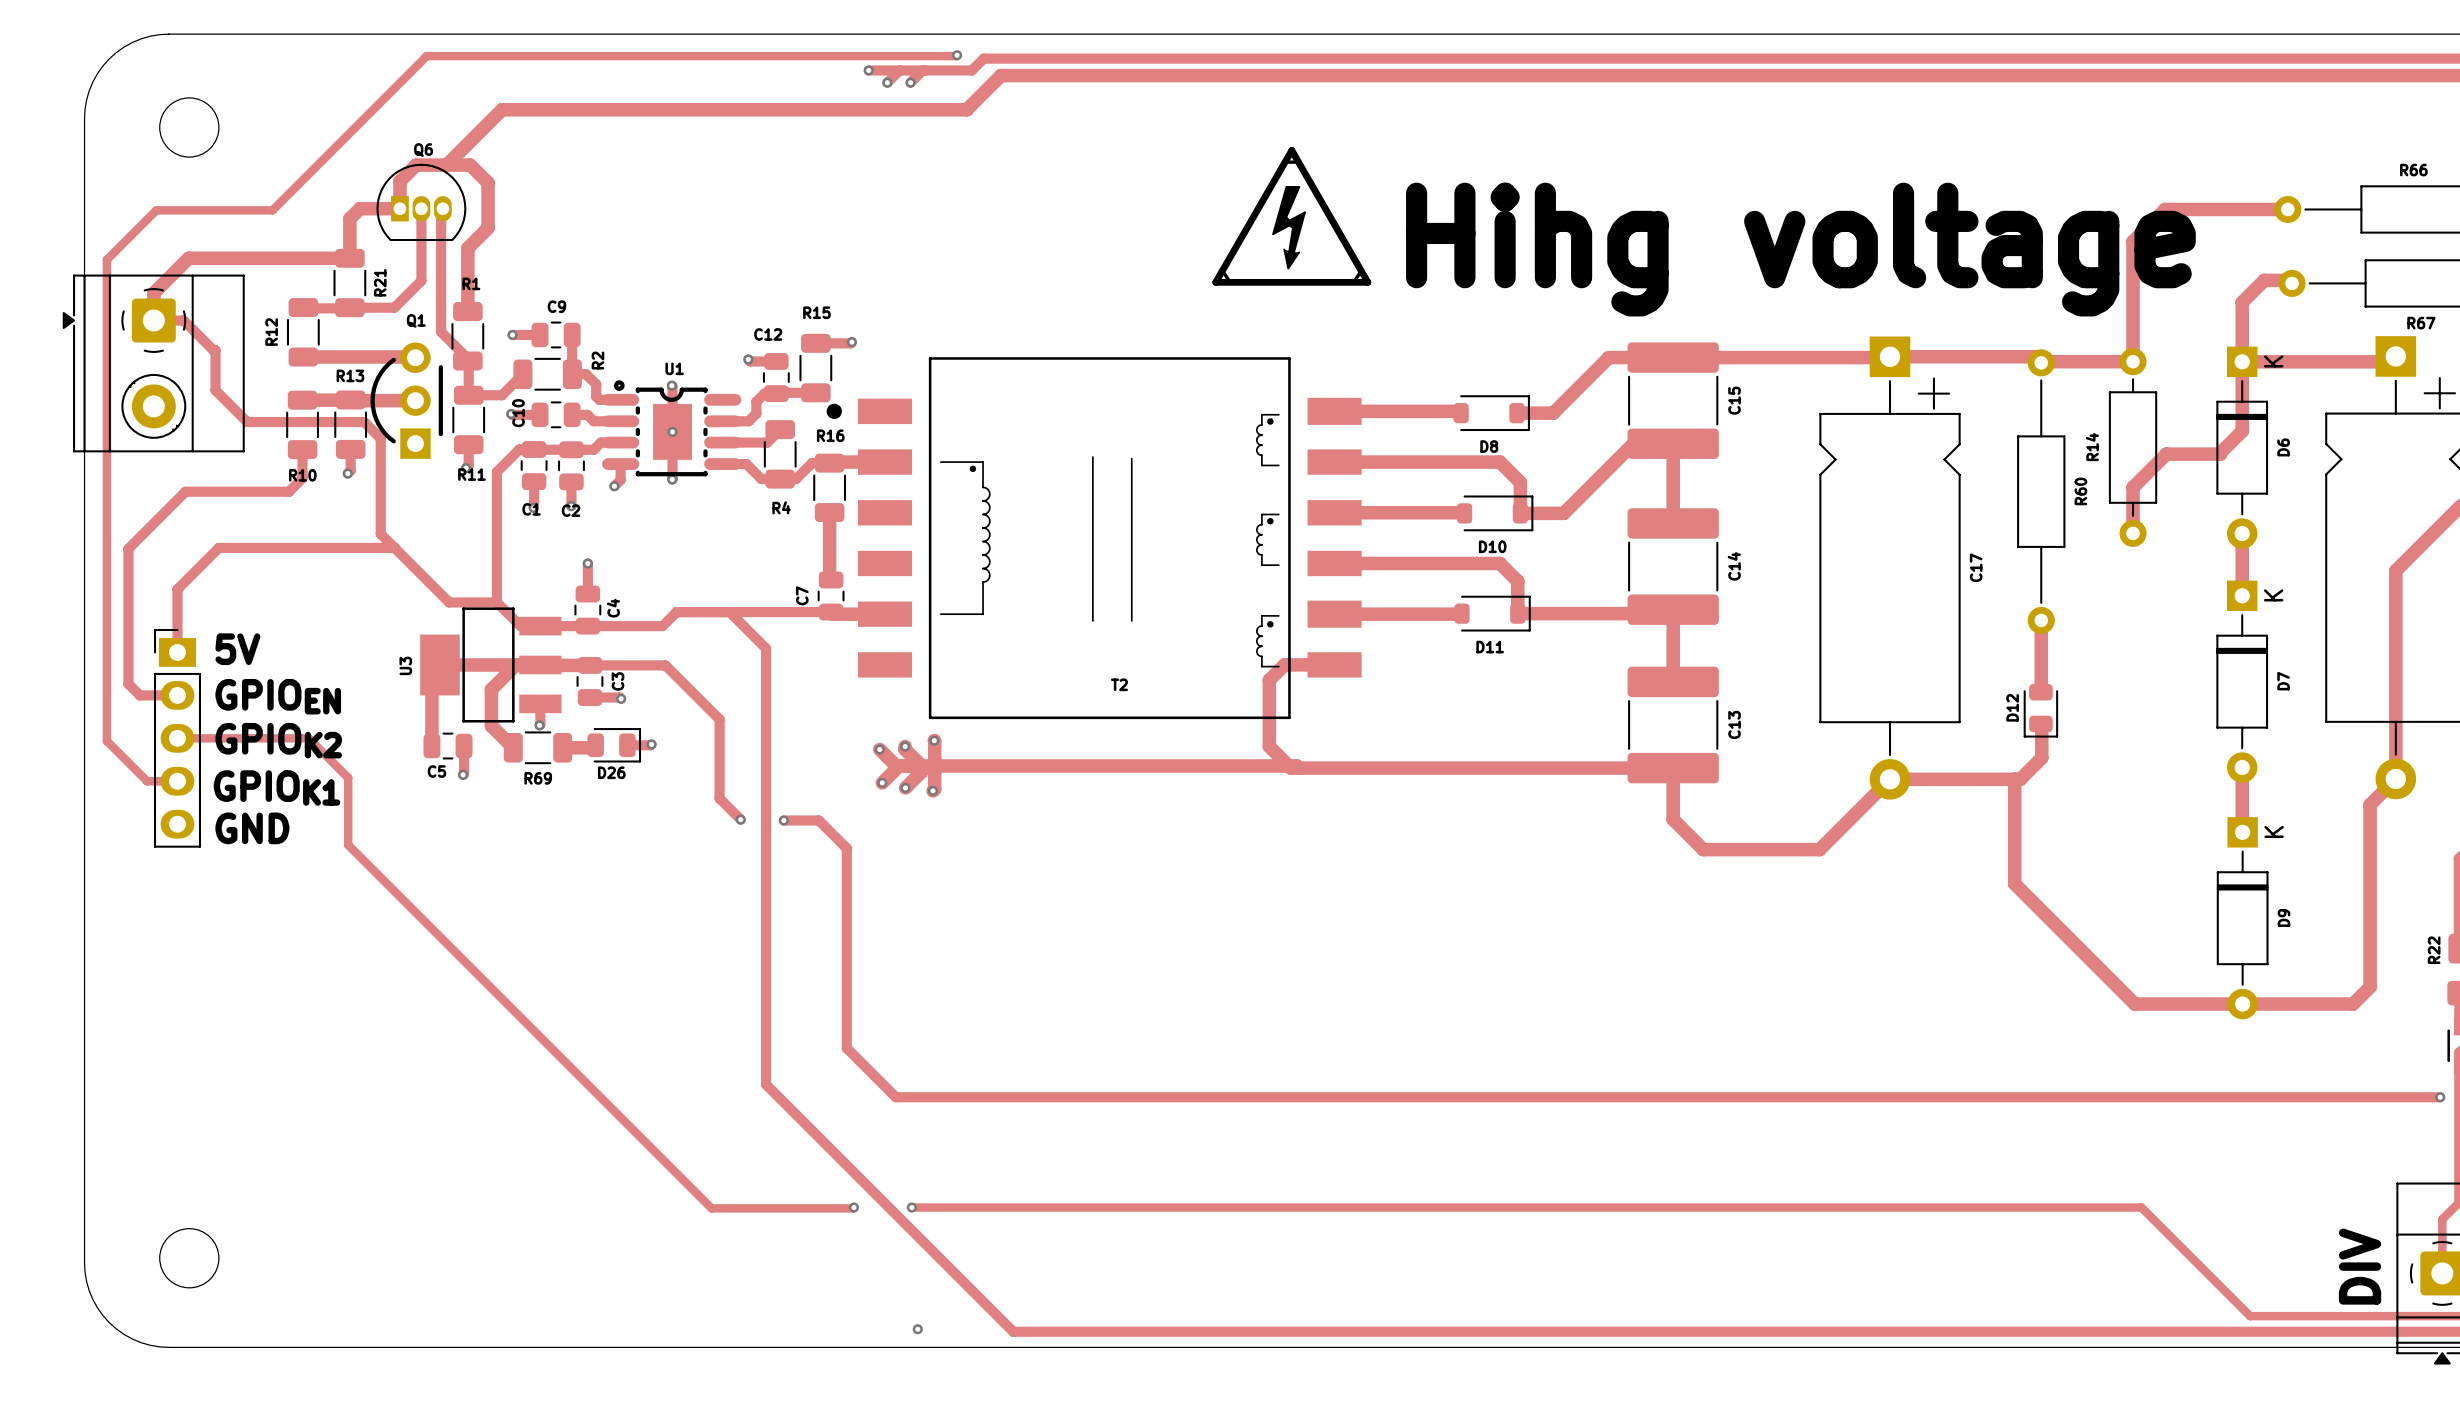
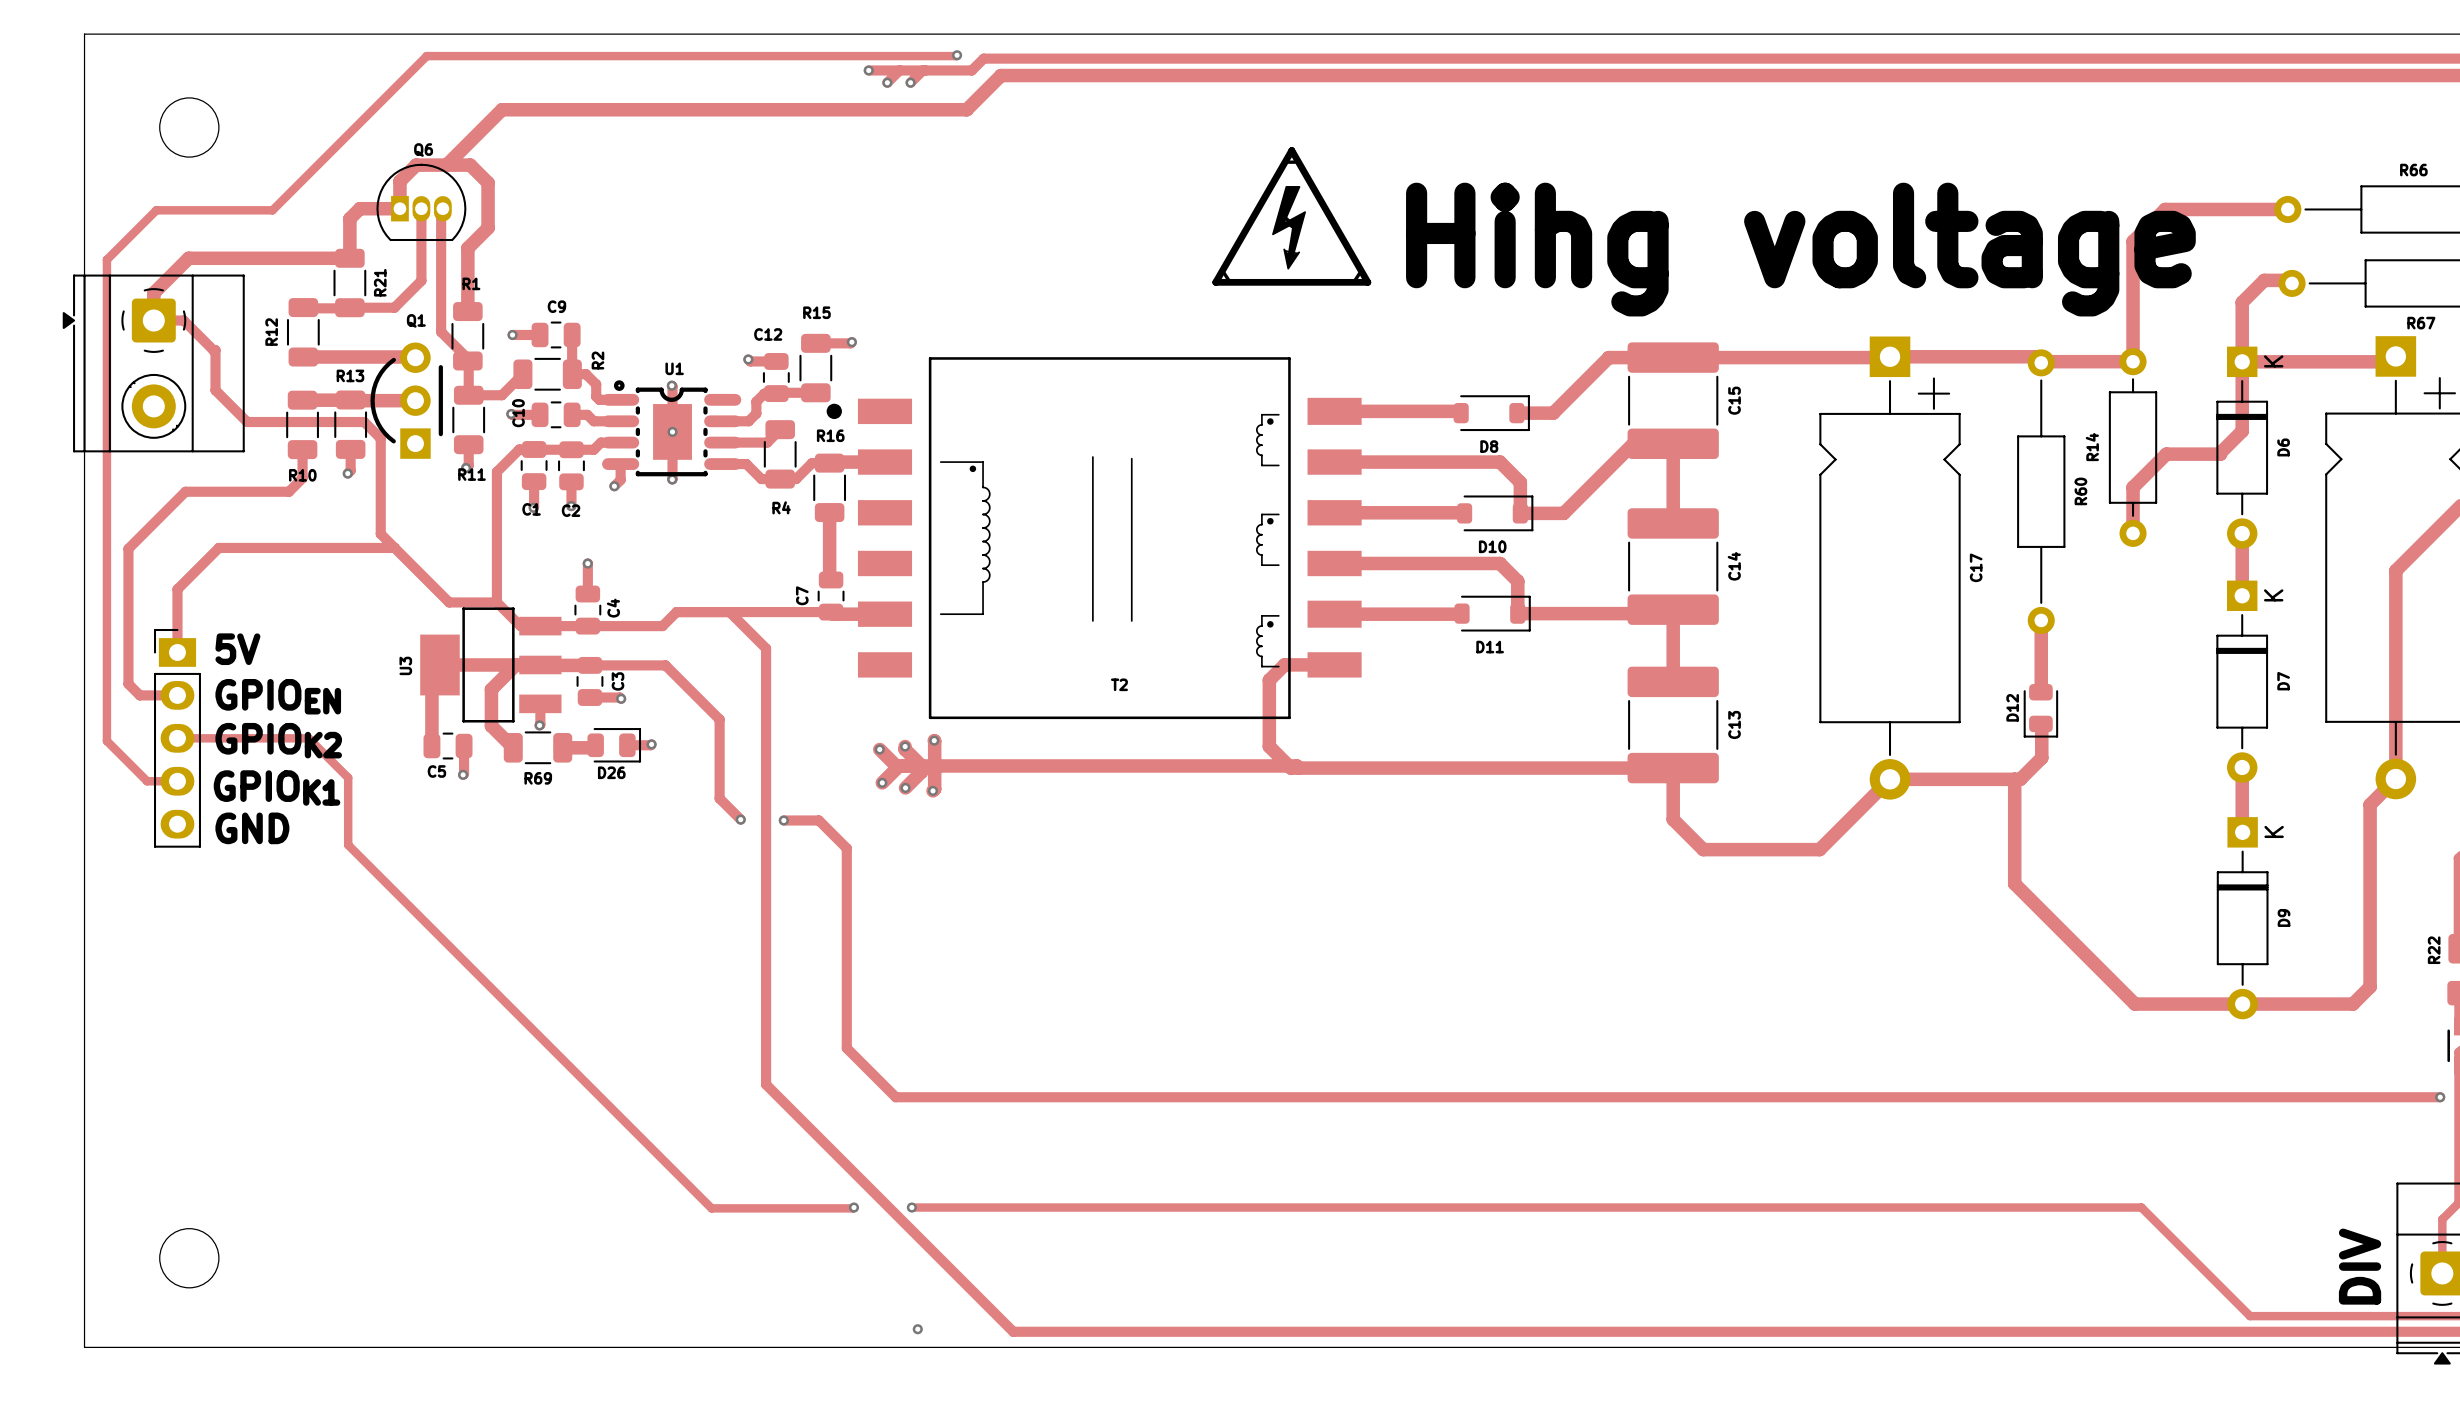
board edge: (169, 34) (150, 36) (132, 42) (109, 58) (92, 81) (86, 99) (84, 118) -> (169, 34) (84, 34) (84, 118)
board edge: (84, 1262) (89, 1290) (97, 1307) (109, 1322) (132, 1339) (150, 1345) (169, 1347) -> (84, 1262) (84, 1347) (169, 1347)

